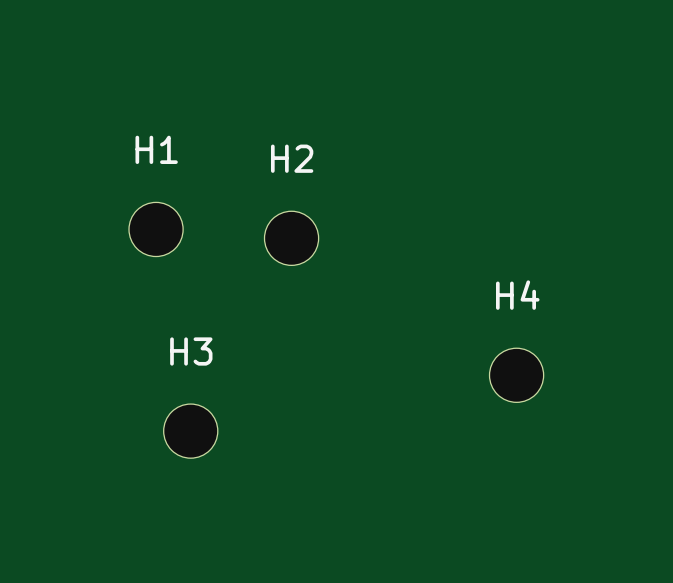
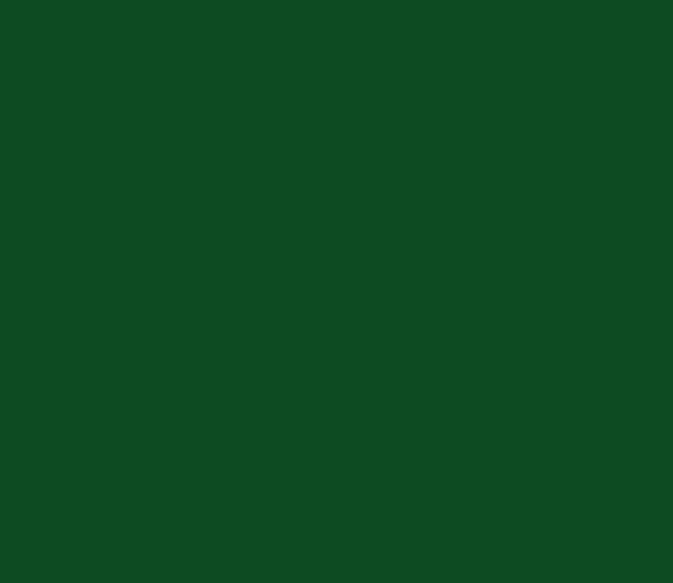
H1: (156, 229) -> none
H2: (291, 238) -> none
H4: (516, 375) -> none
H3: (190, 431) -> none

